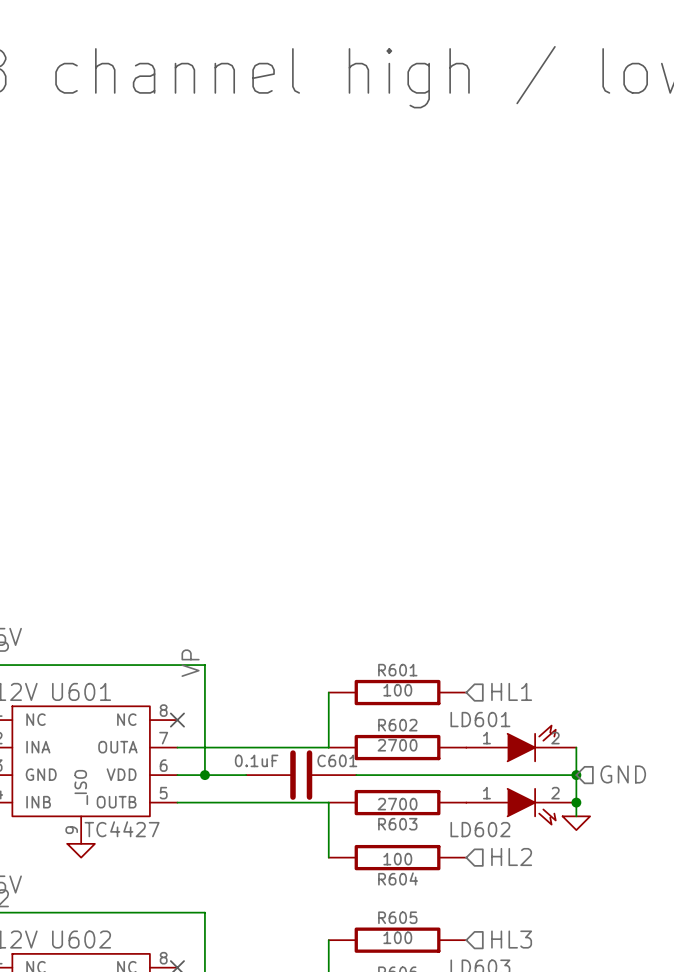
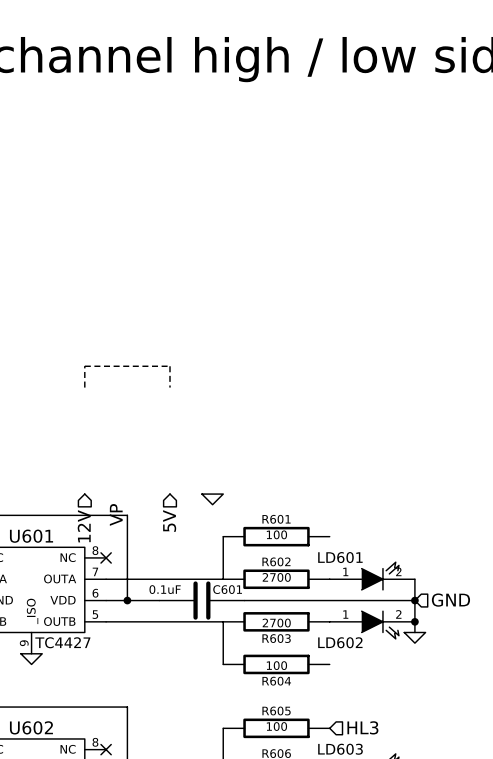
line: none -> (84, 387) (84, 366) (170, 366) (170, 387)
power symbol: none -> (212, 499)
hierarchical label: none -> 5V (169, 521)
hierarchical label: none -> 12V (84, 526)
hierarchical label: HL1 (511, 691) -> none
hierarchical label: HL2 (511, 857) -> none

